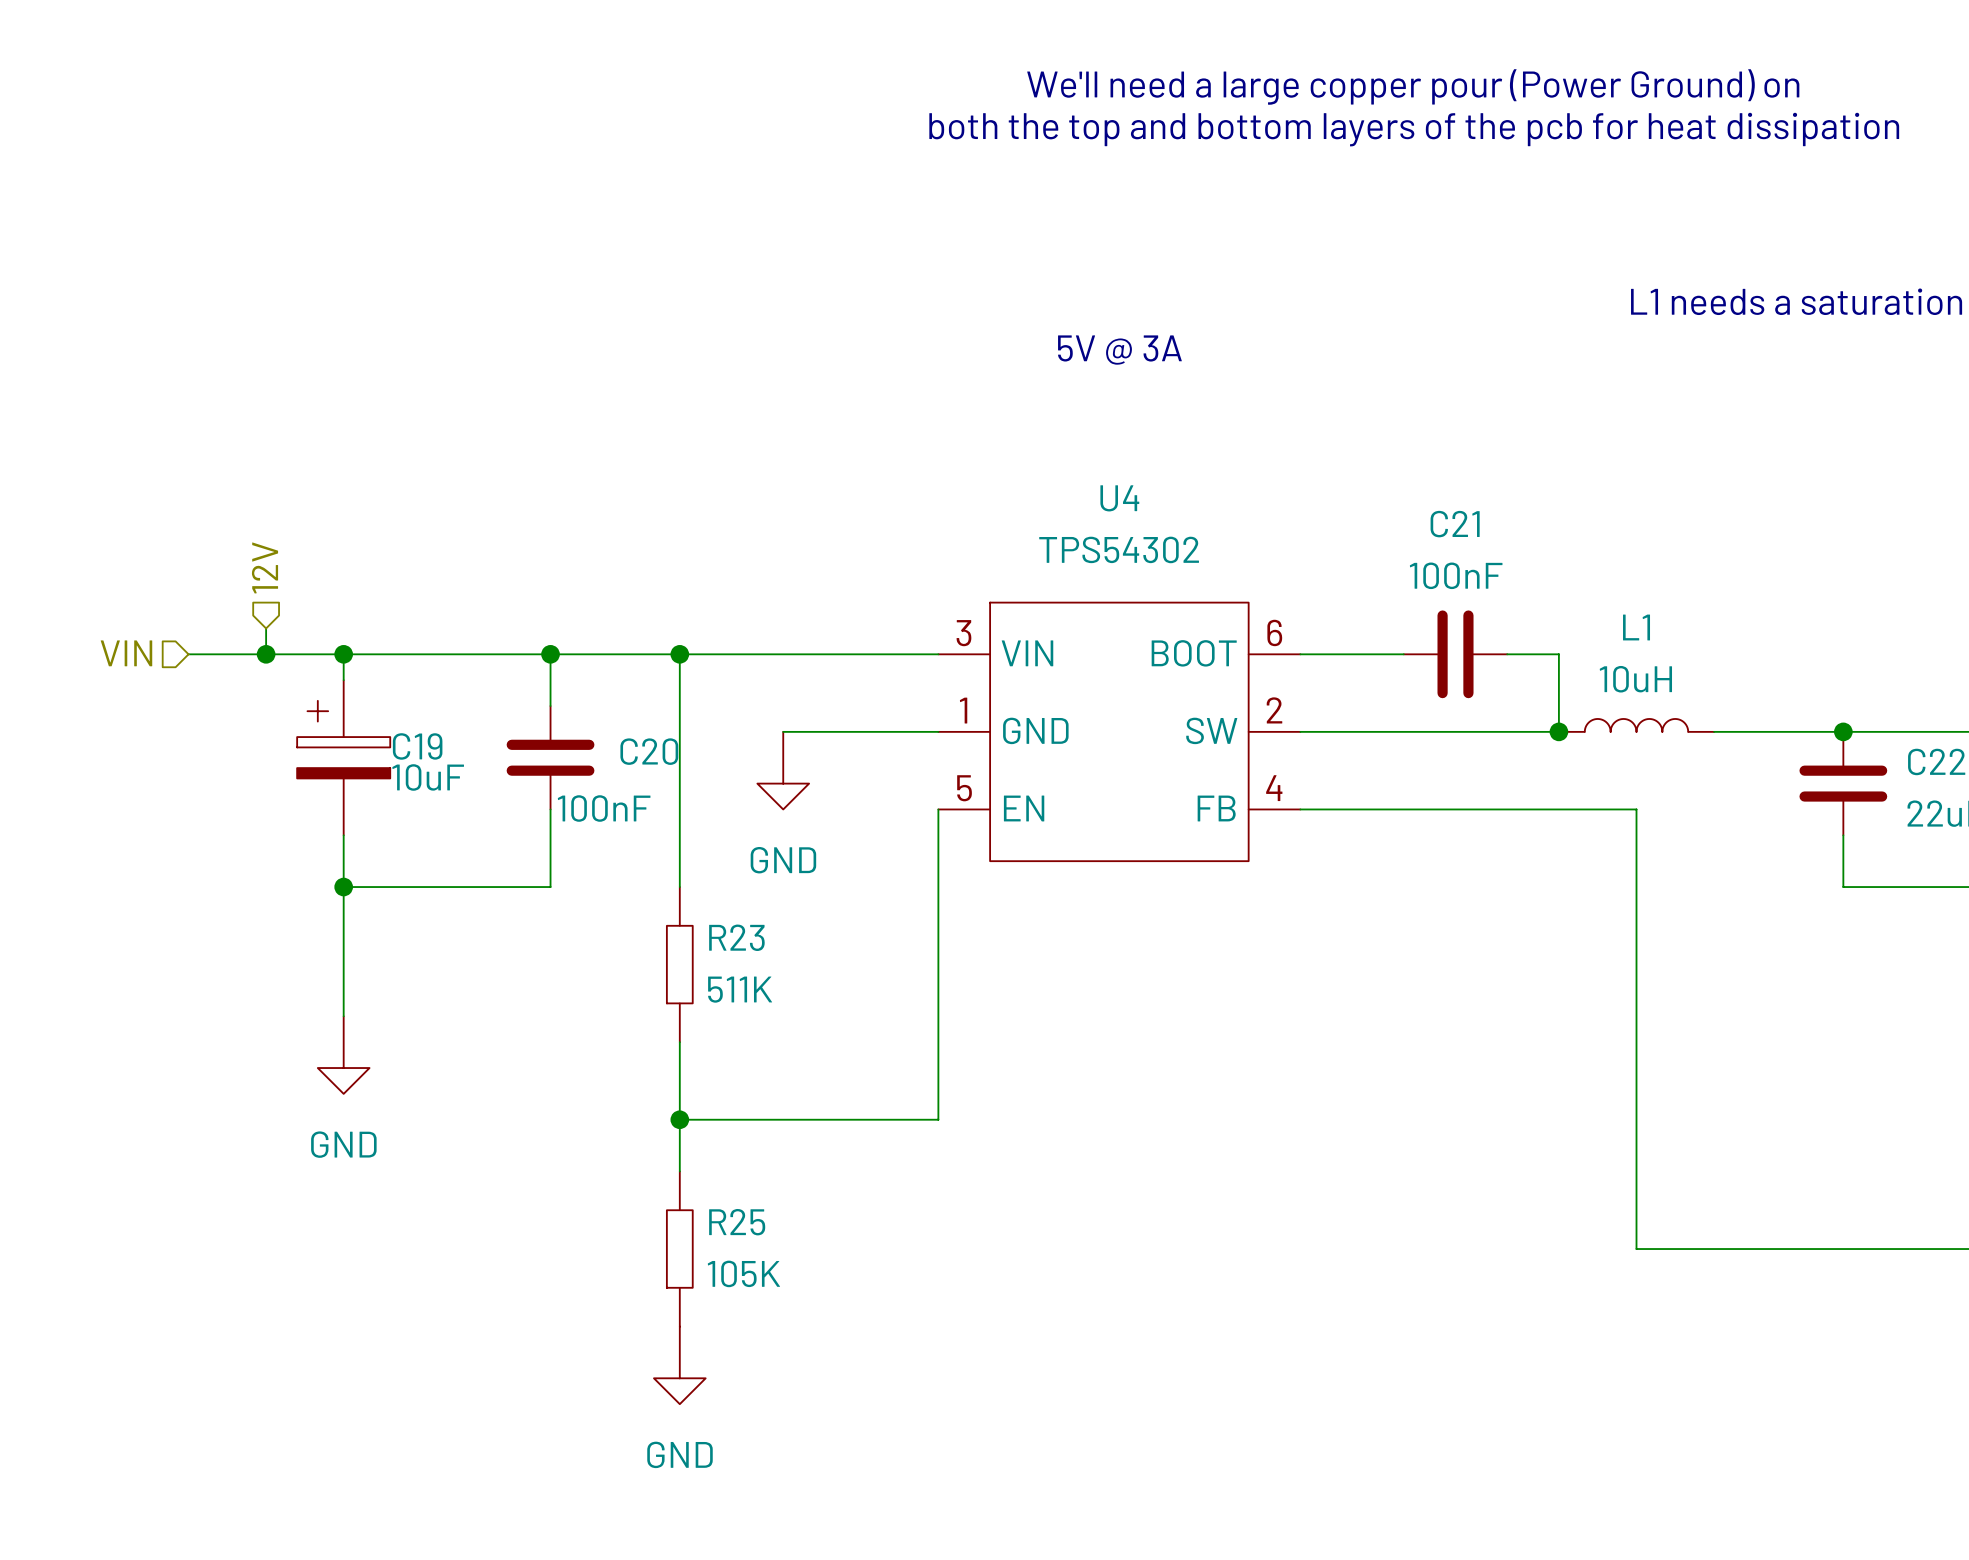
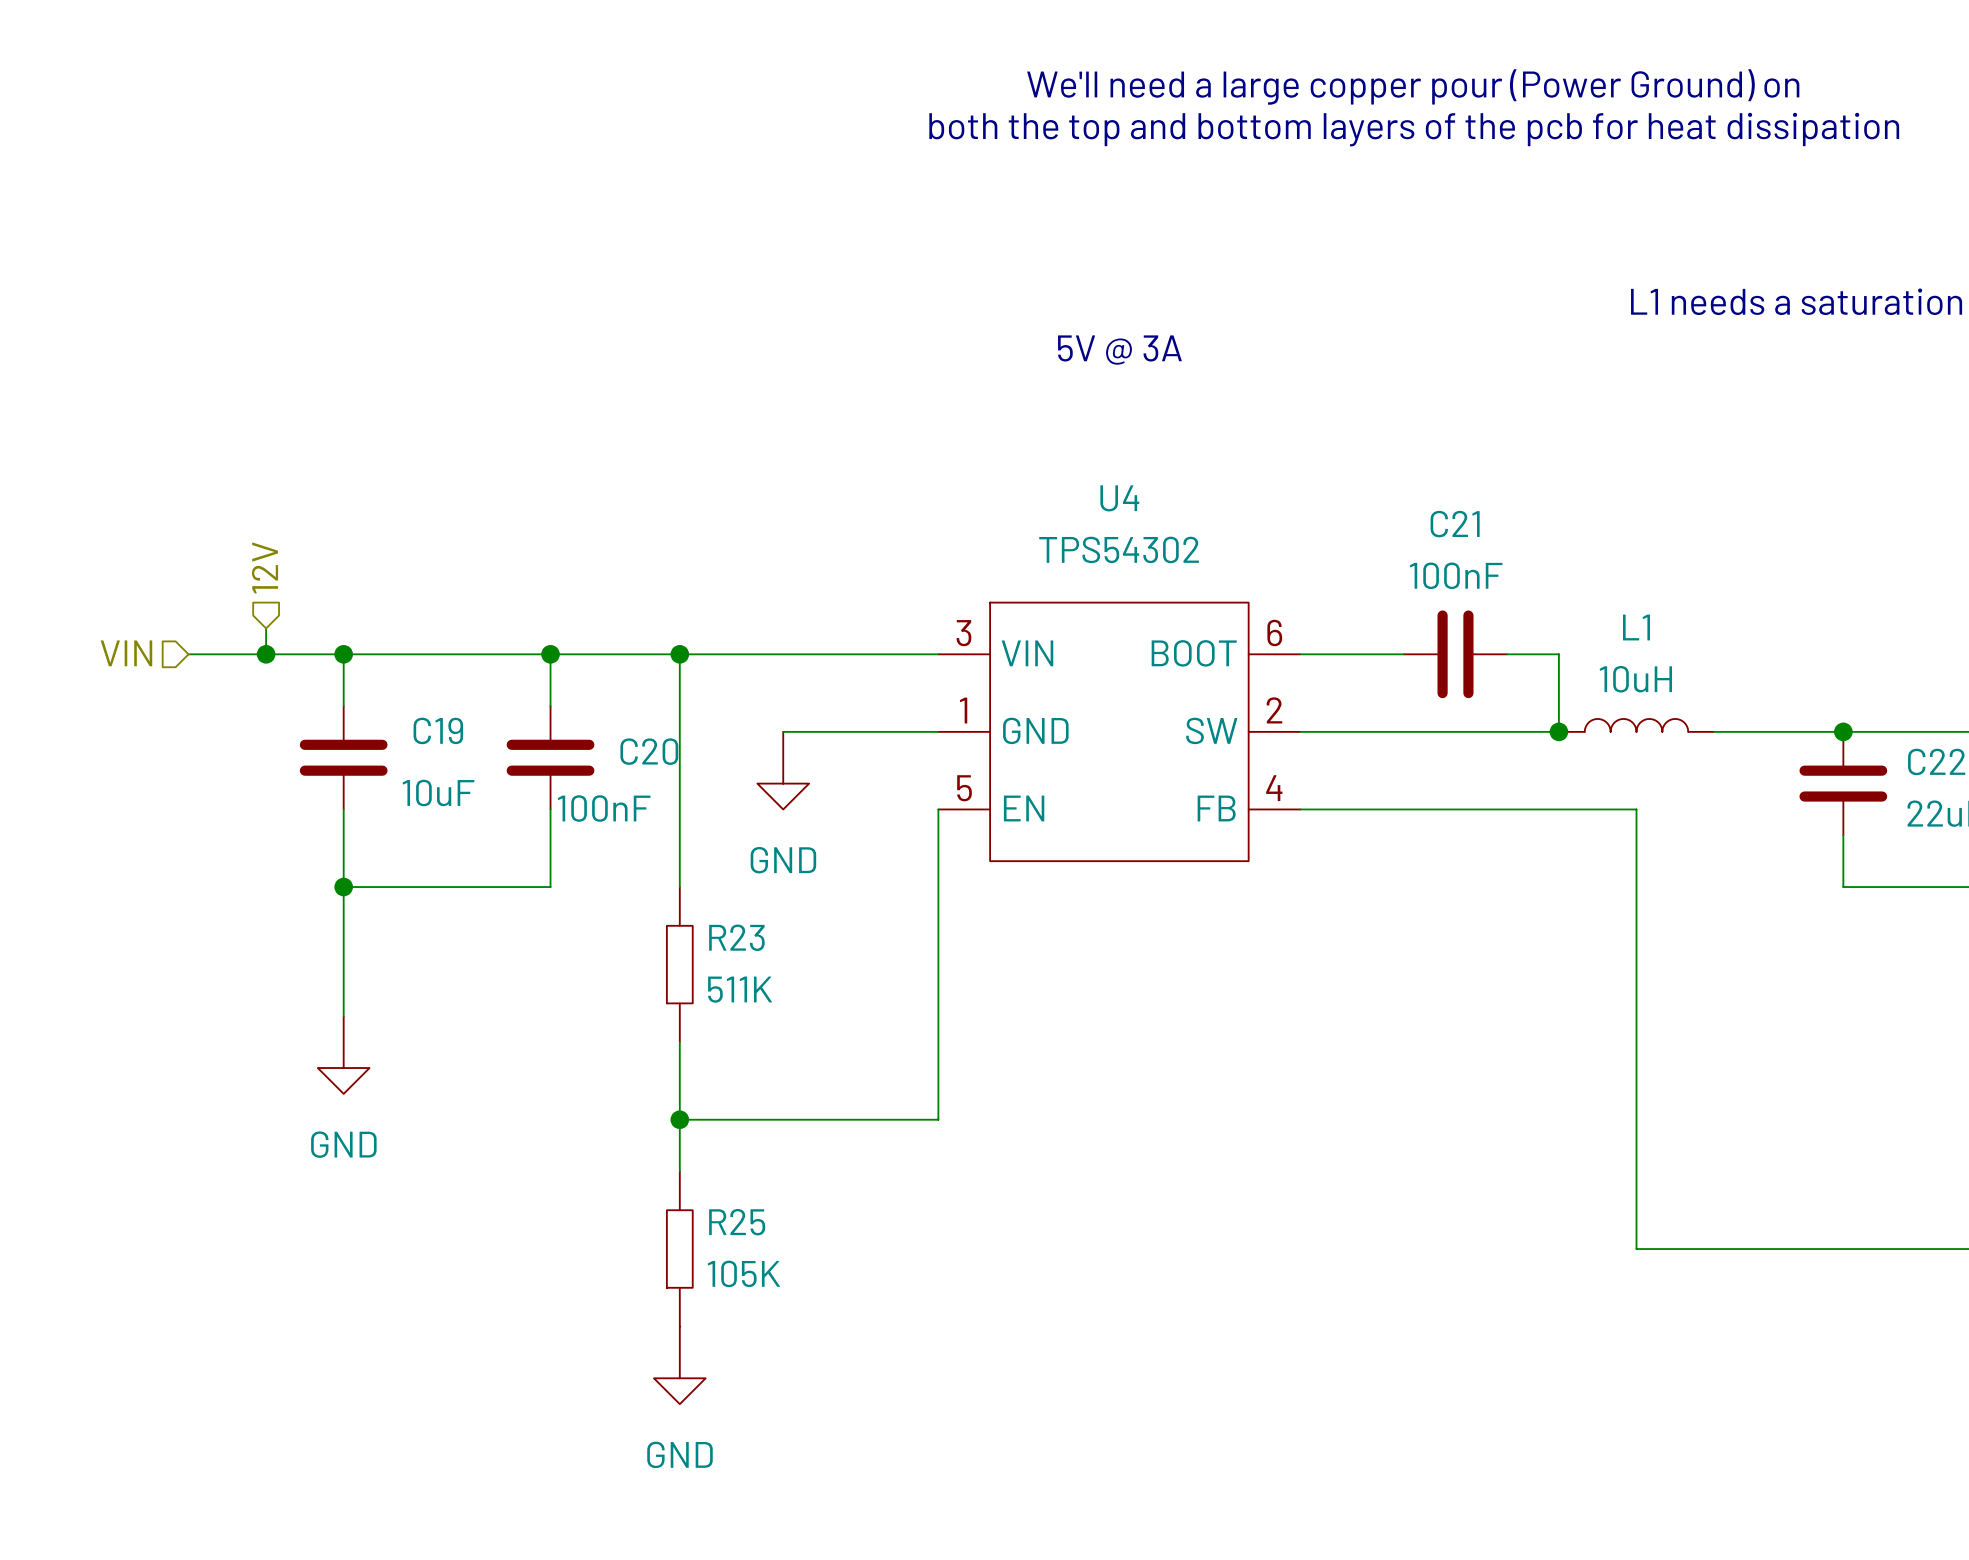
C19 symbol: [297, 680, 391, 836] -> [299, 706, 388, 810]

